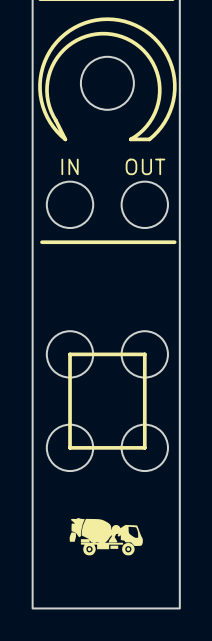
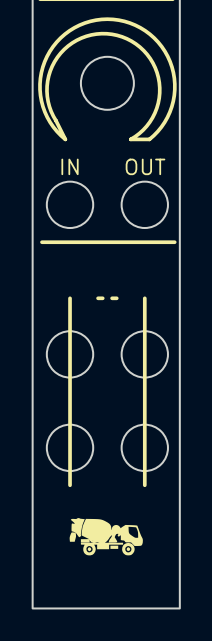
line: none -> (98, 298) (102, 298)
line: none -> (112, 298) (116, 298)
line: none -> (144, 298) (144, 354)
line: (70, 354) (144, 354) -> (70, 354) (70, 298)
line: (70, 447) (144, 447) -> (70, 447) (70, 485)
line: none -> (144, 447) (144, 485)

